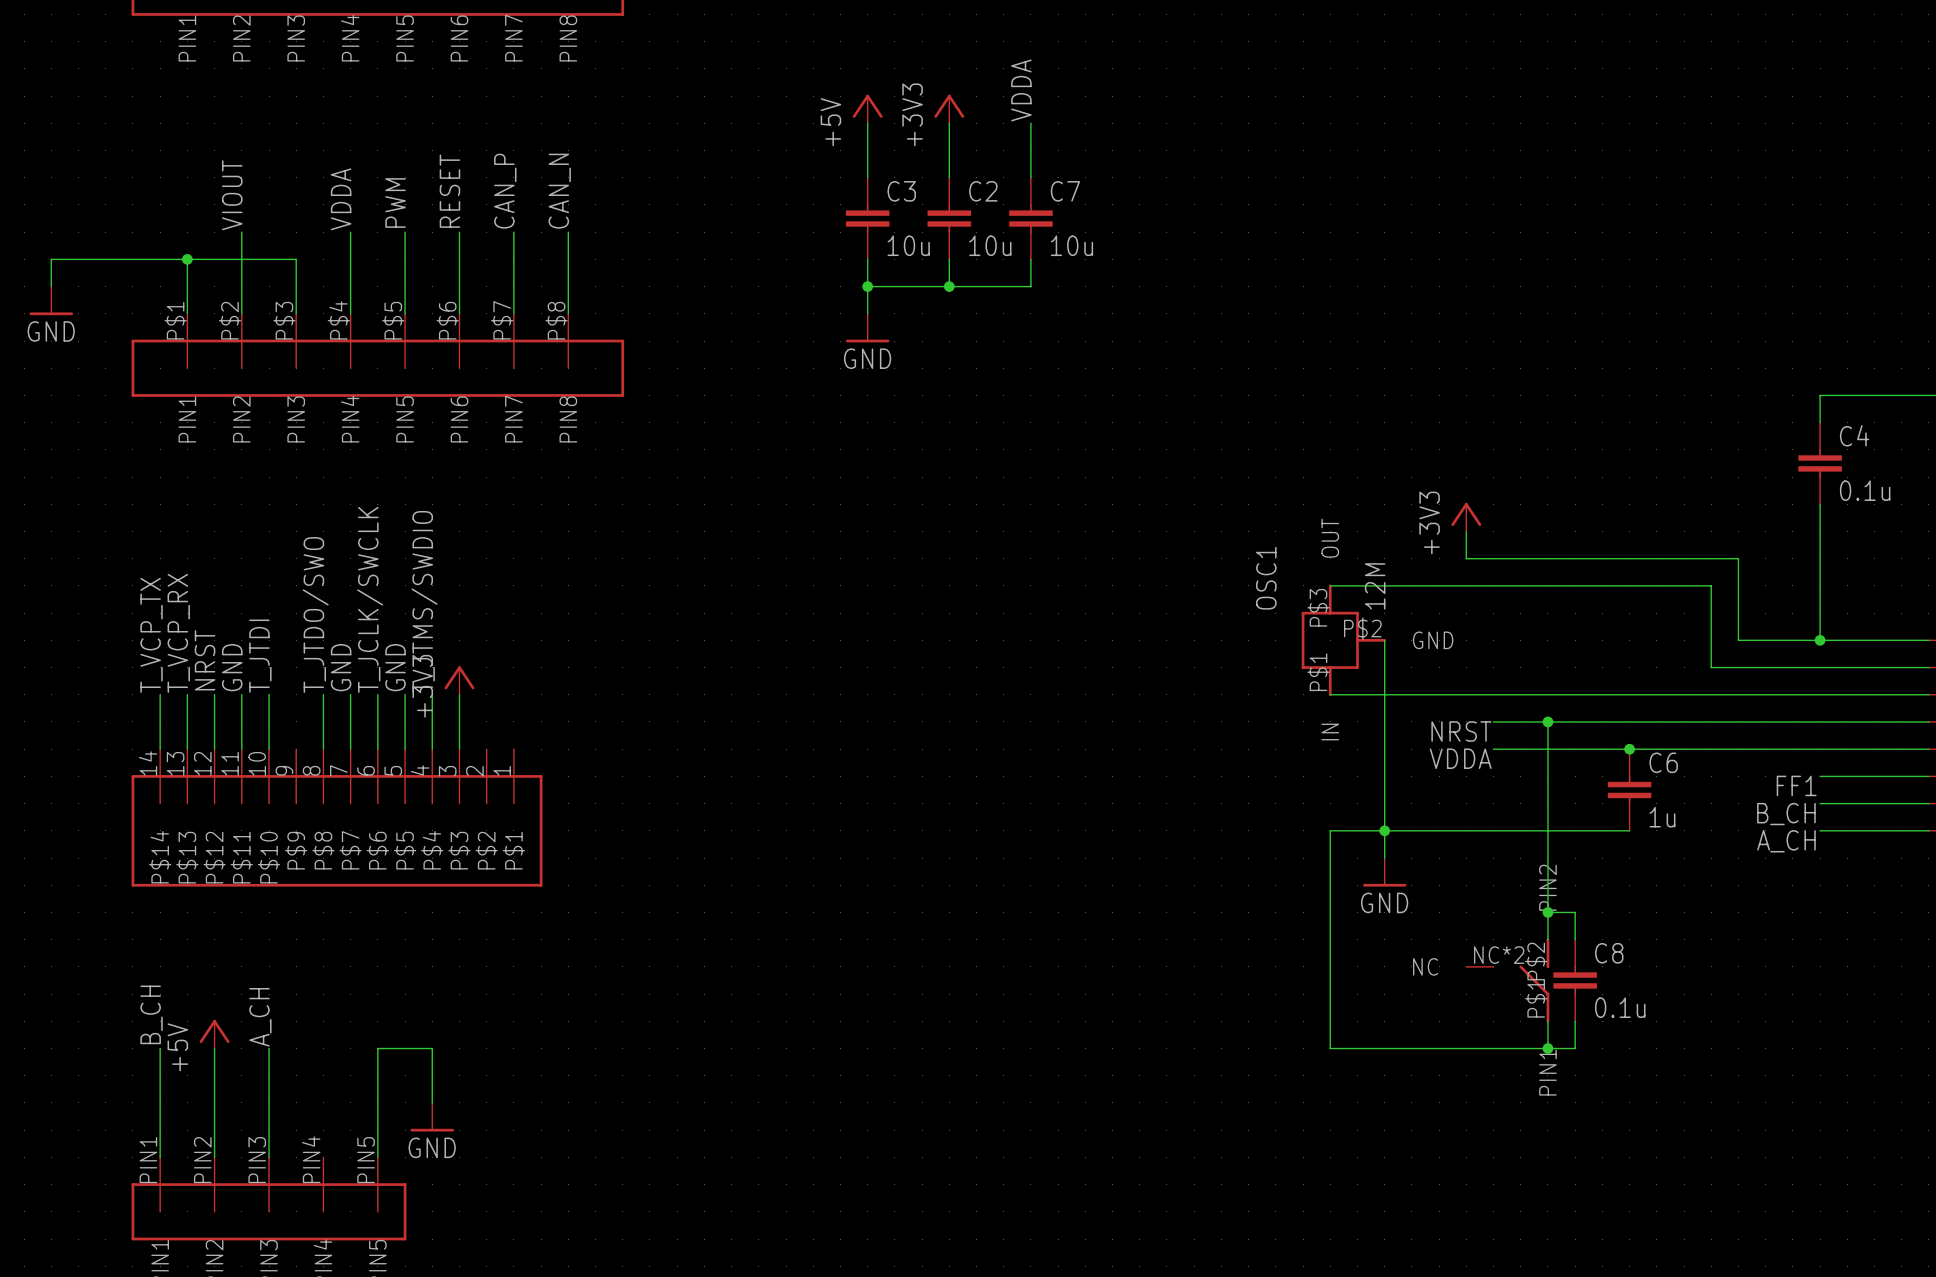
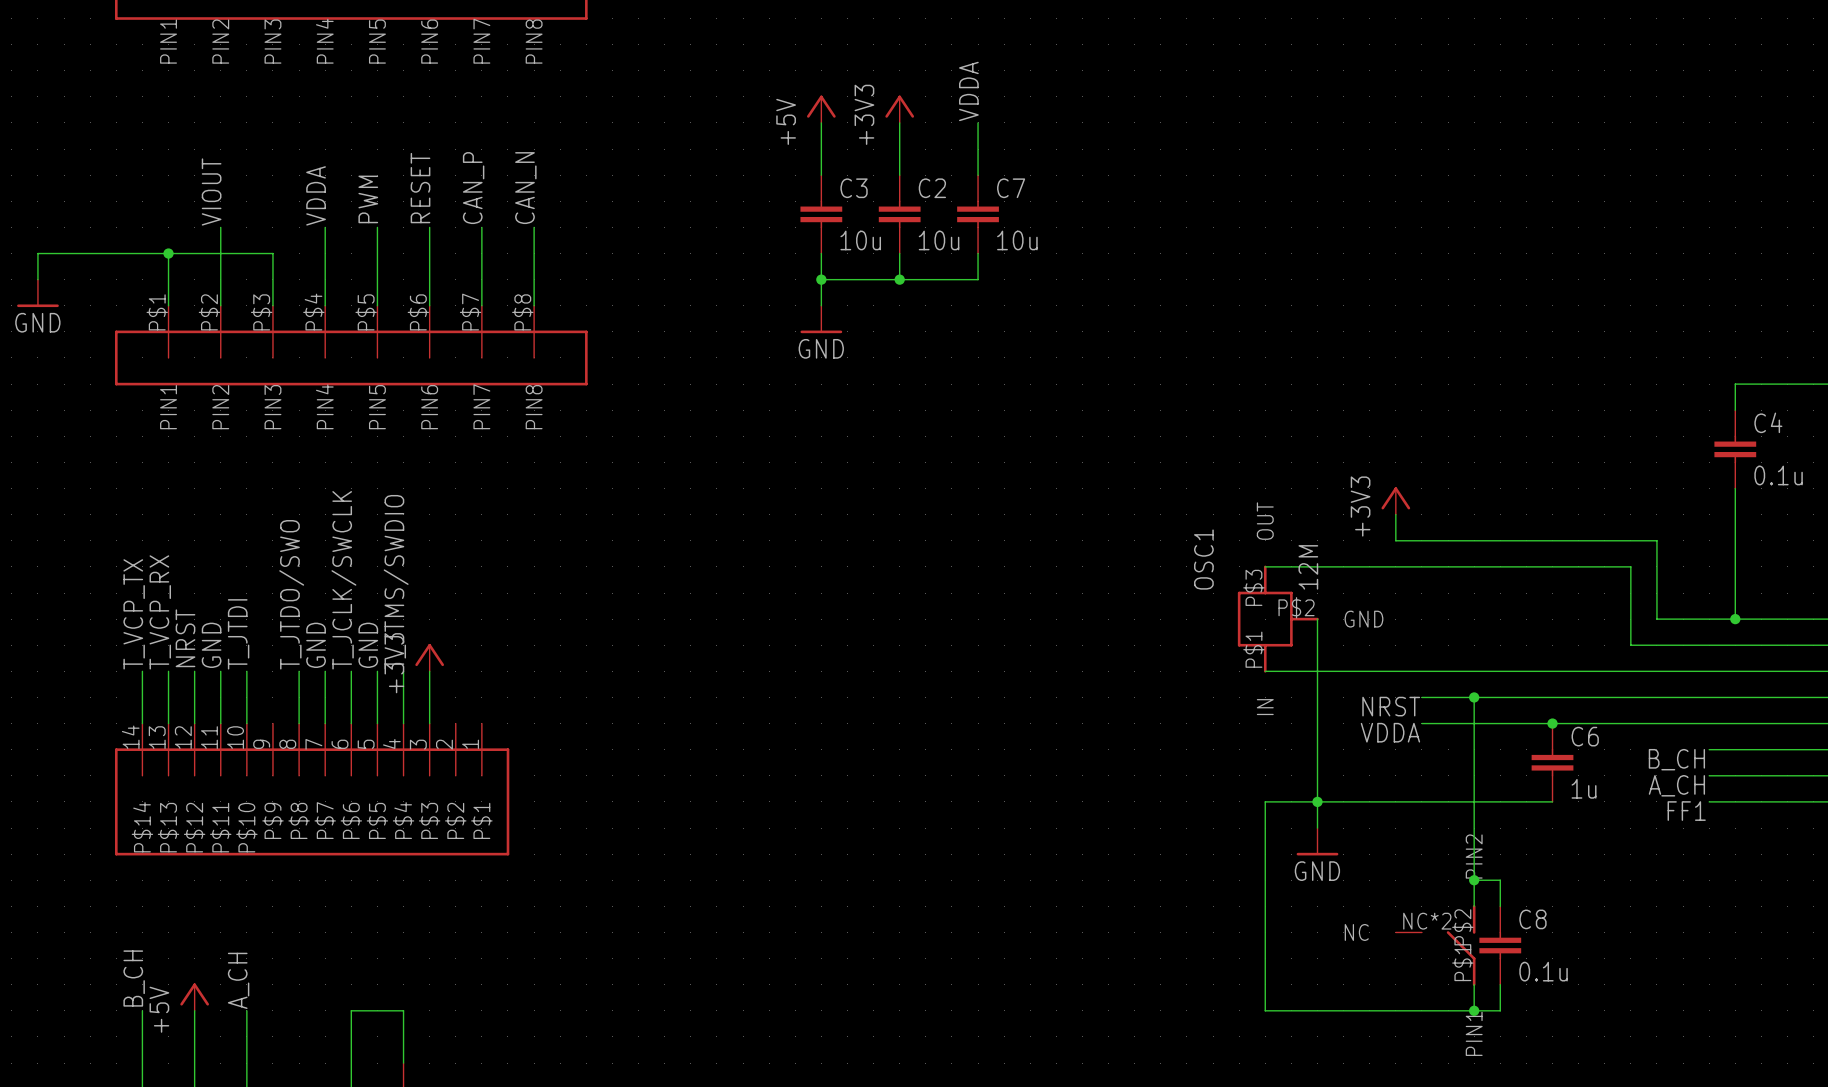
wire: none -> (1709, 749) (1735, 749)
label position: FF1 (1796, 785) -> FF1 (1686, 811)
wire: none -> (1709, 775) (1735, 775)
label position: B_CH (1786, 814) -> B_CH (1676, 759)
wire: none -> (1709, 801) (1735, 801)
label position: A_CH (1786, 841) -> A_CH (1676, 785)

